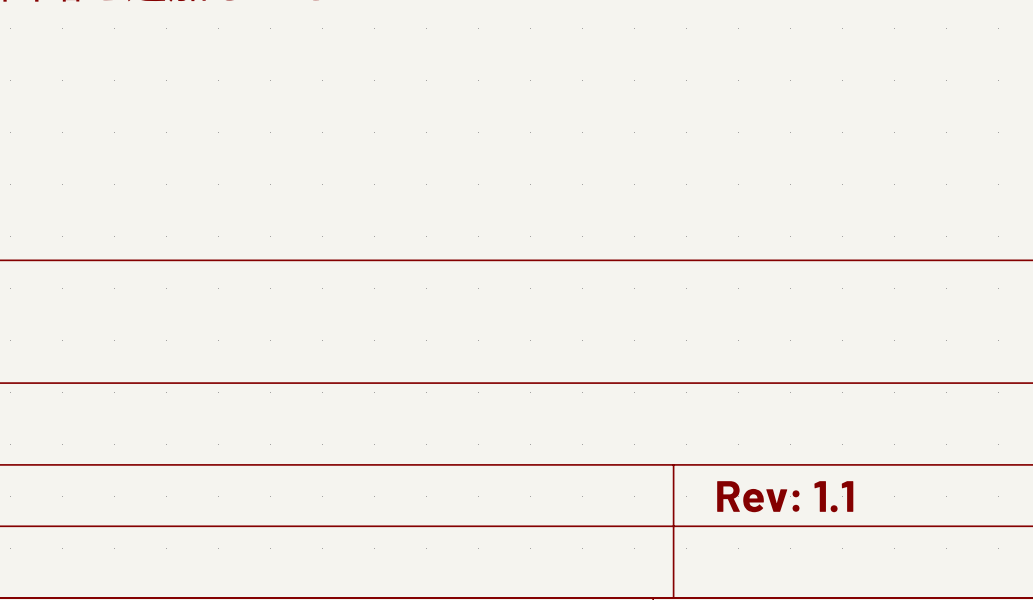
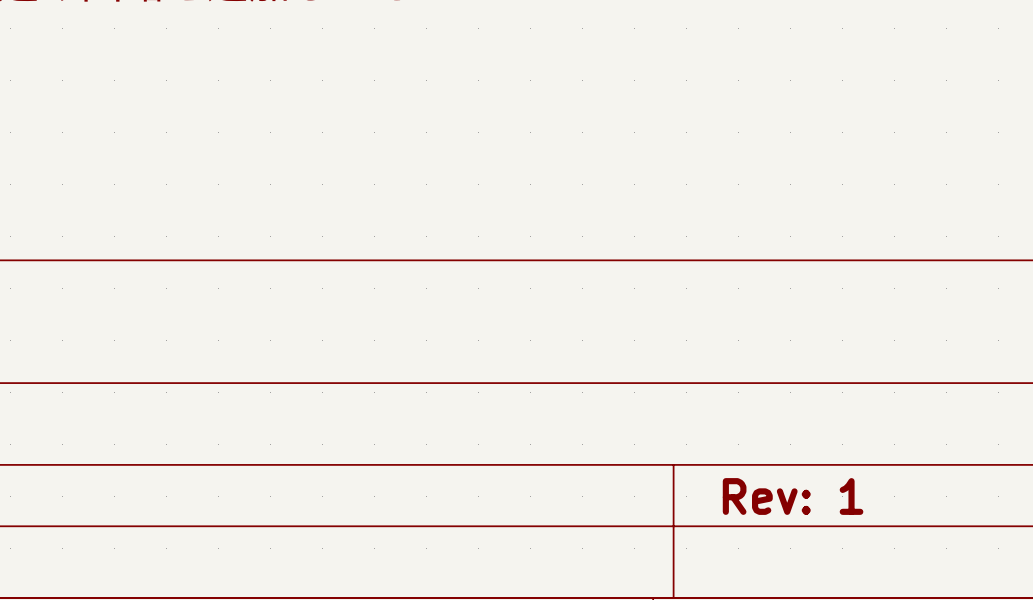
title block: Rev: 1.1 (785, 496) -> Rev: 1 (793, 496)

